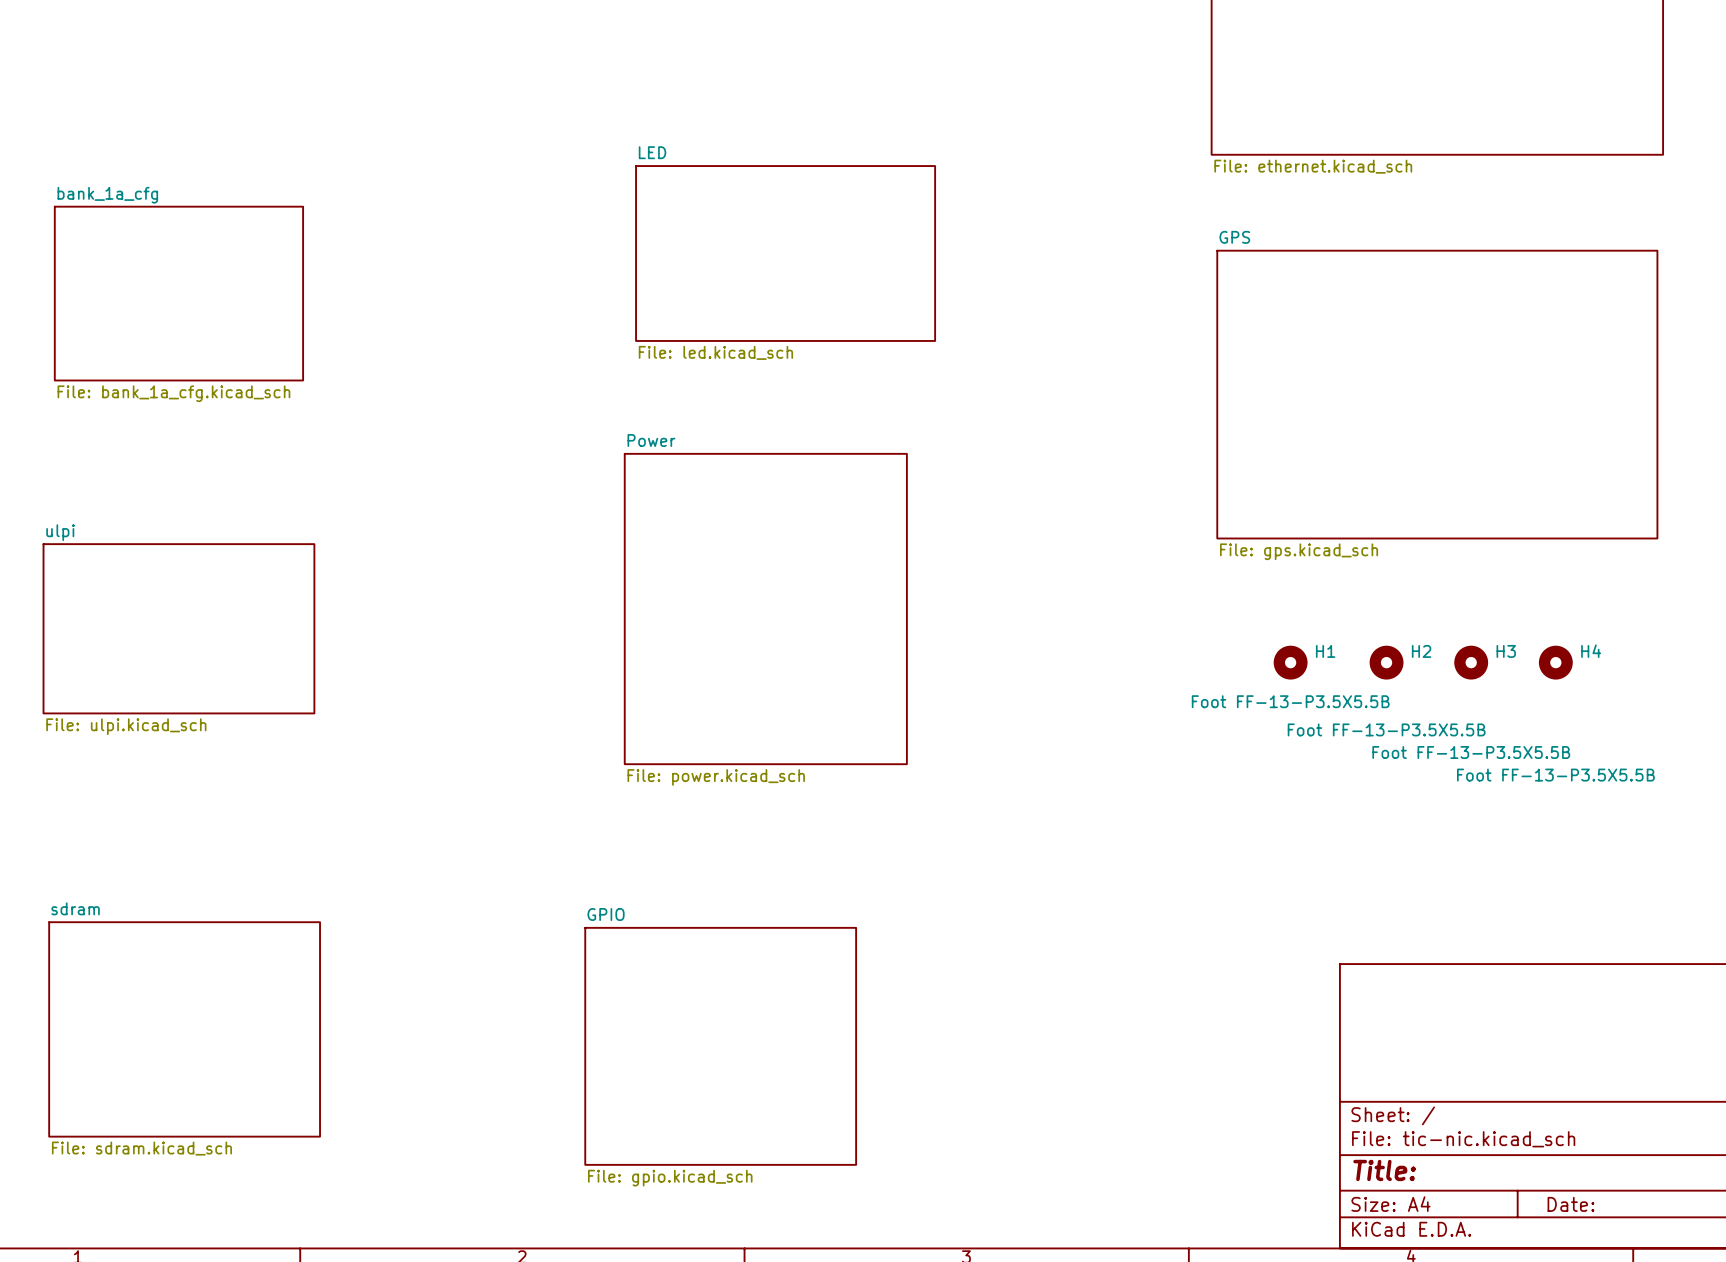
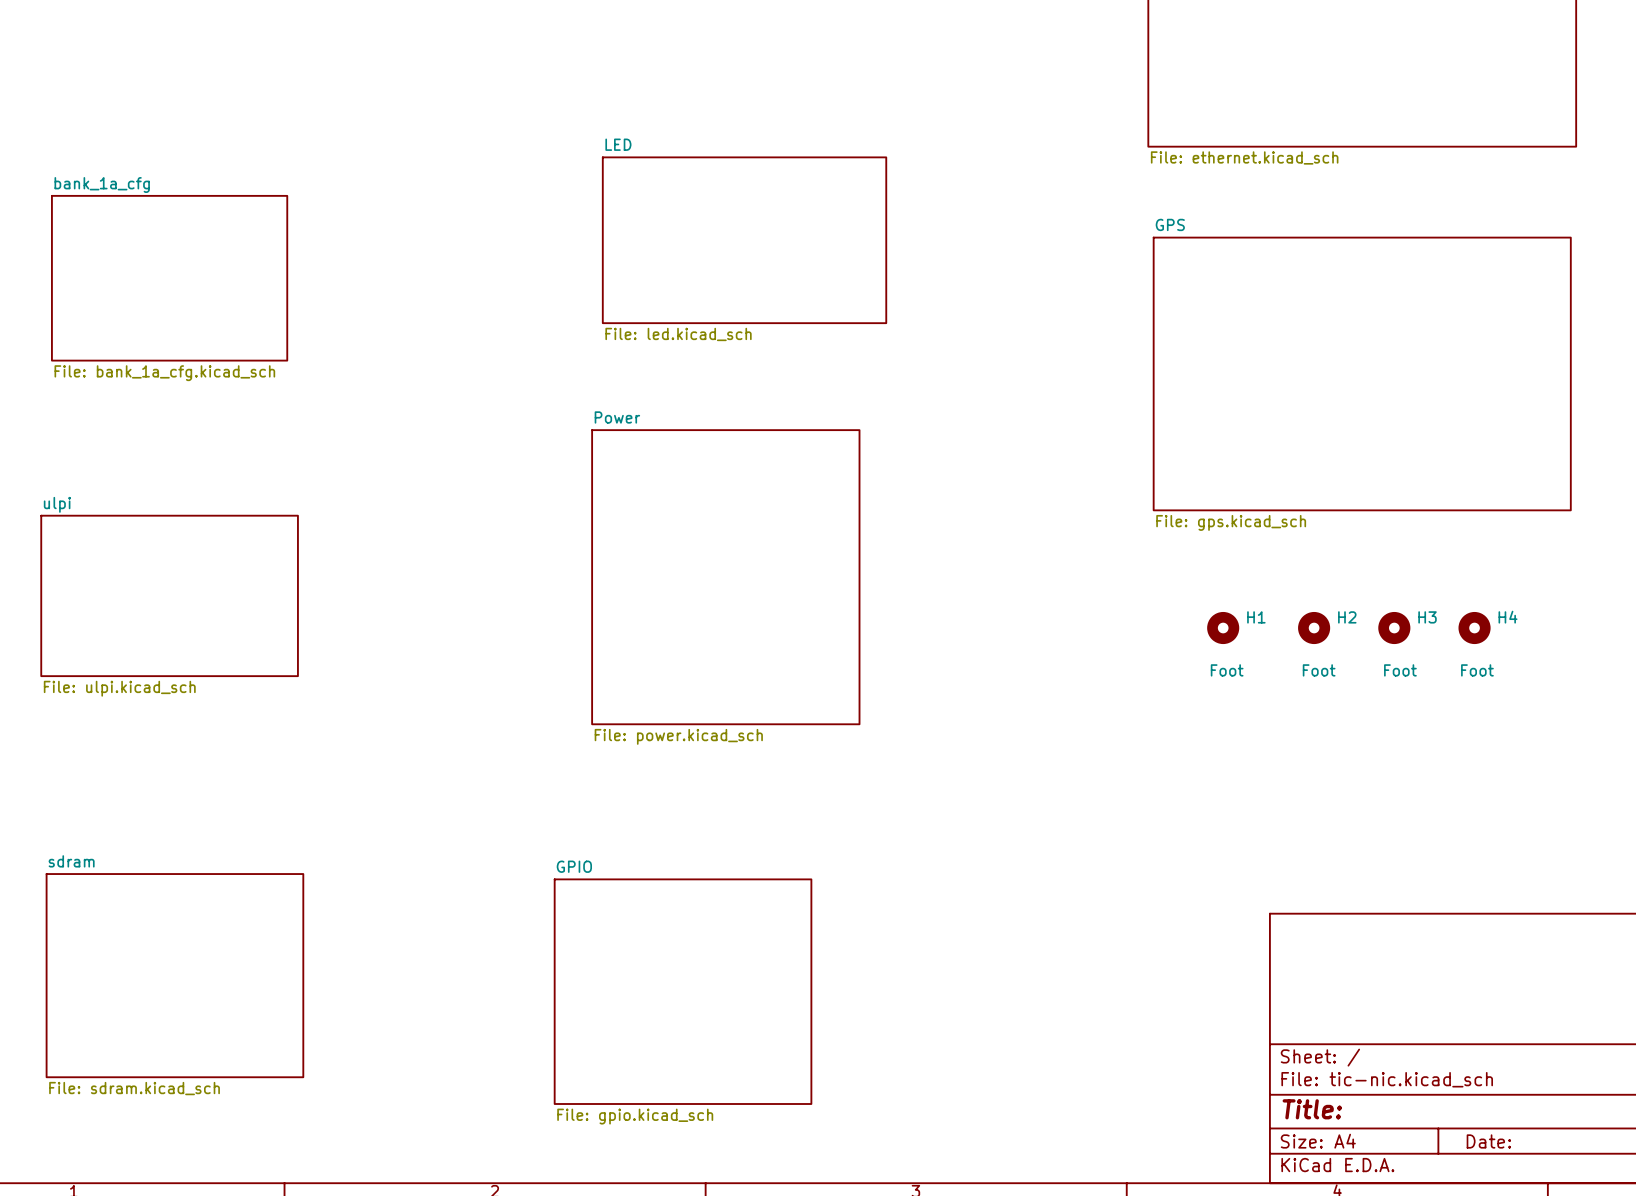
H1 value: Foot FF-13-P3.5X5.5B (1290, 701) -> Foot (1227, 670)
H2 value: Foot FF-13-P3.5X5.5B (1386, 729) -> Foot (1319, 670)
H3 value: Foot FF-13-P3.5X5.5B (1471, 752) -> Foot (1400, 670)
H4 value: Foot FF-13-P3.5X5.5B (1555, 775) -> Foot (1477, 670)

